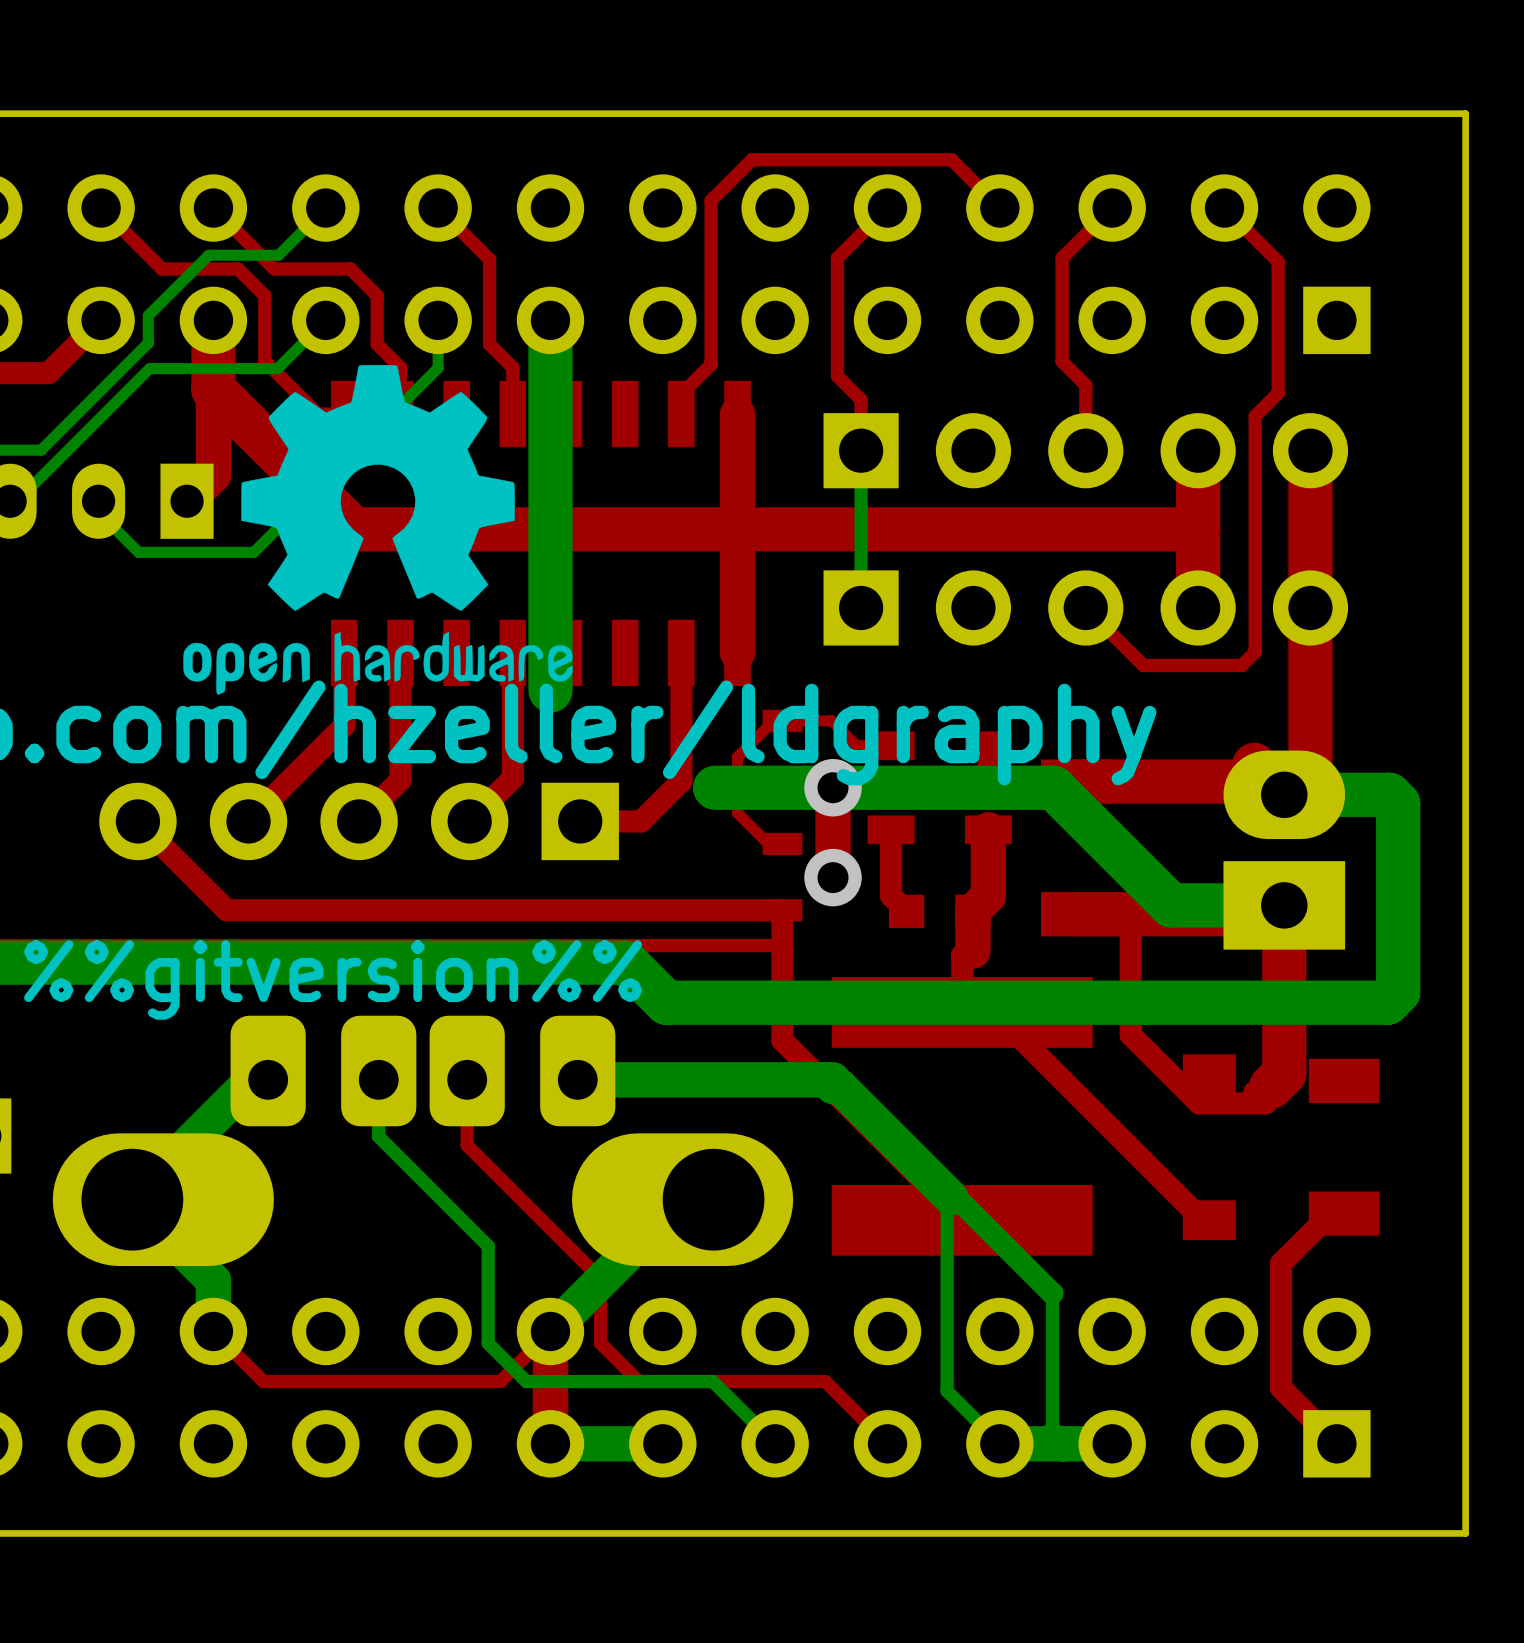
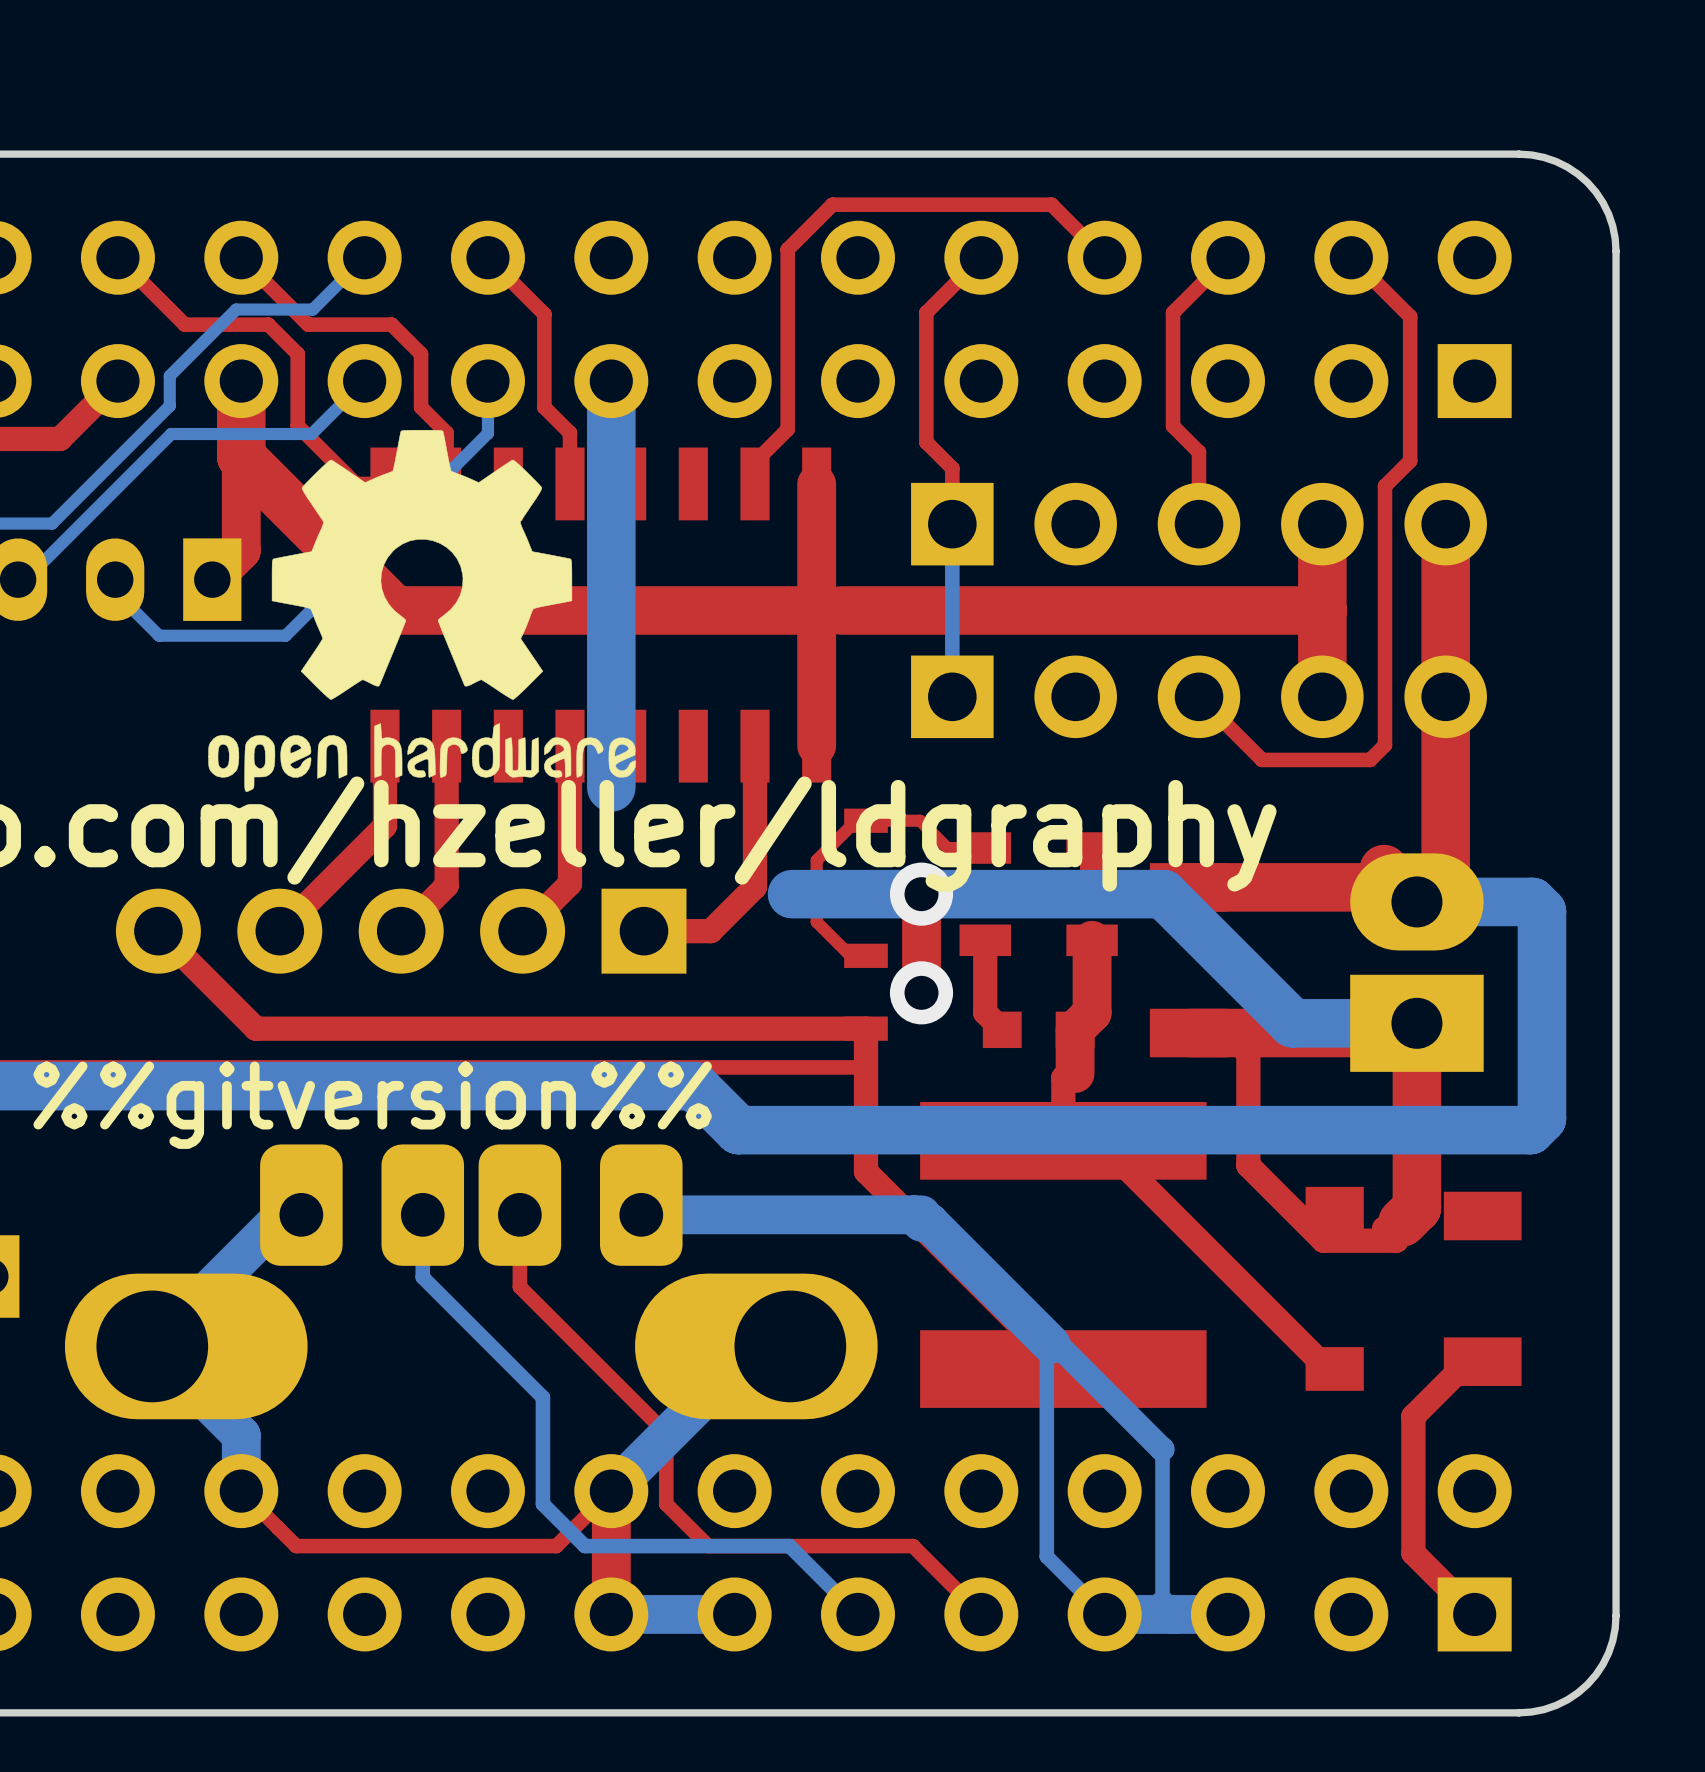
board edge: (1377, 113) (1465, 113) (1465, 202) -> (1518, 154) (1544, 157) (1556, 161) (1567, 167) (1587, 182) (1603, 202) (1608, 214) (1612, 226) (1616, 251)
board edge: (1465, 1444) (1465, 1533) (1377, 1533) -> (1616, 1615) (1612, 1640) (1608, 1652) (1603, 1664) (1587, 1684) (1567, 1699) (1556, 1705) (1544, 1709) (1518, 1712)

